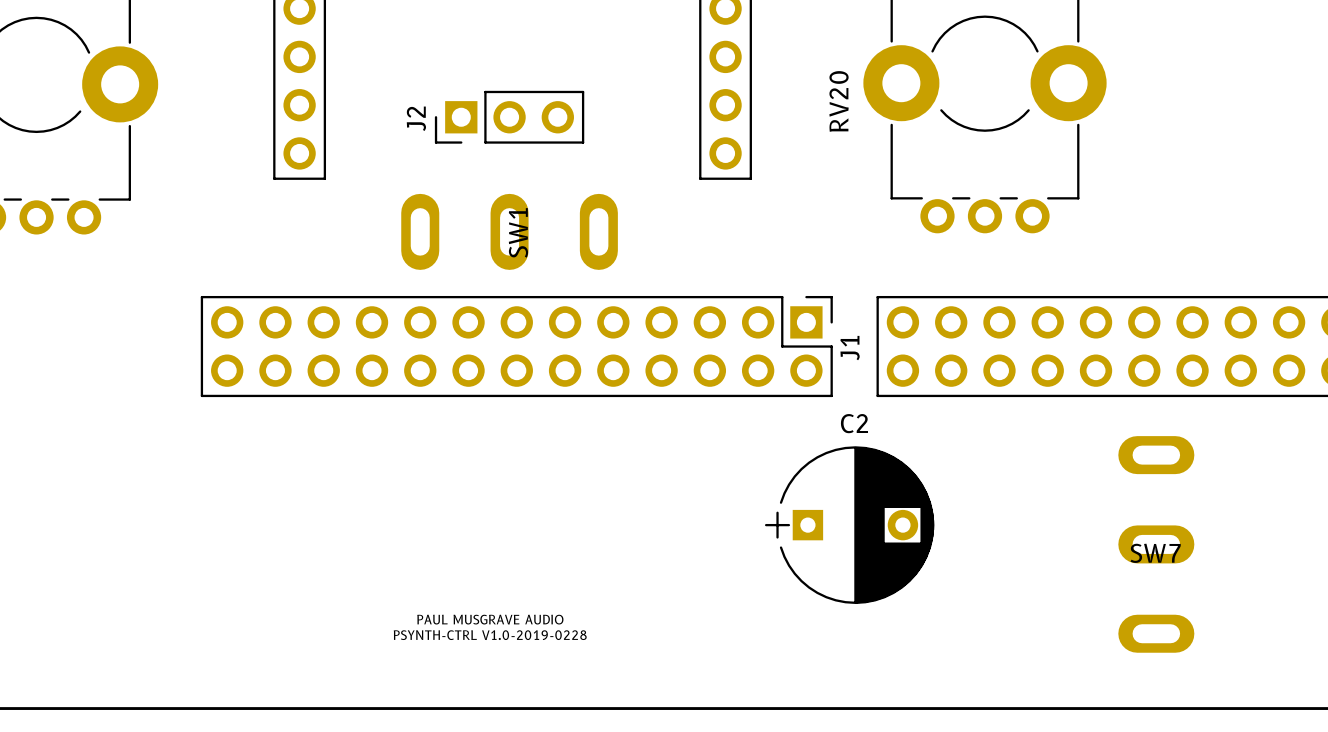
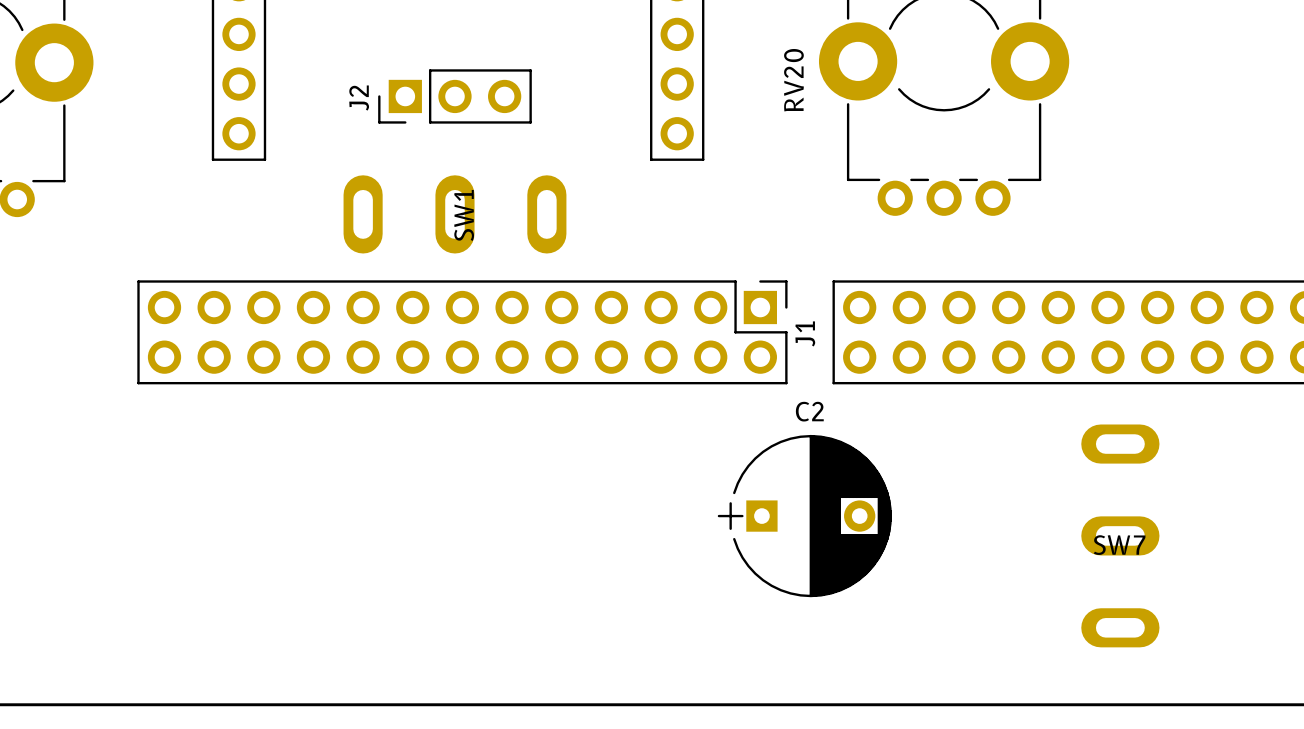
text: PAUL MUSGRAVE AUDIO (490, 619) -> none
text: PSYNTH-CTRL V1.0-2019-0228 (490, 635) -> none

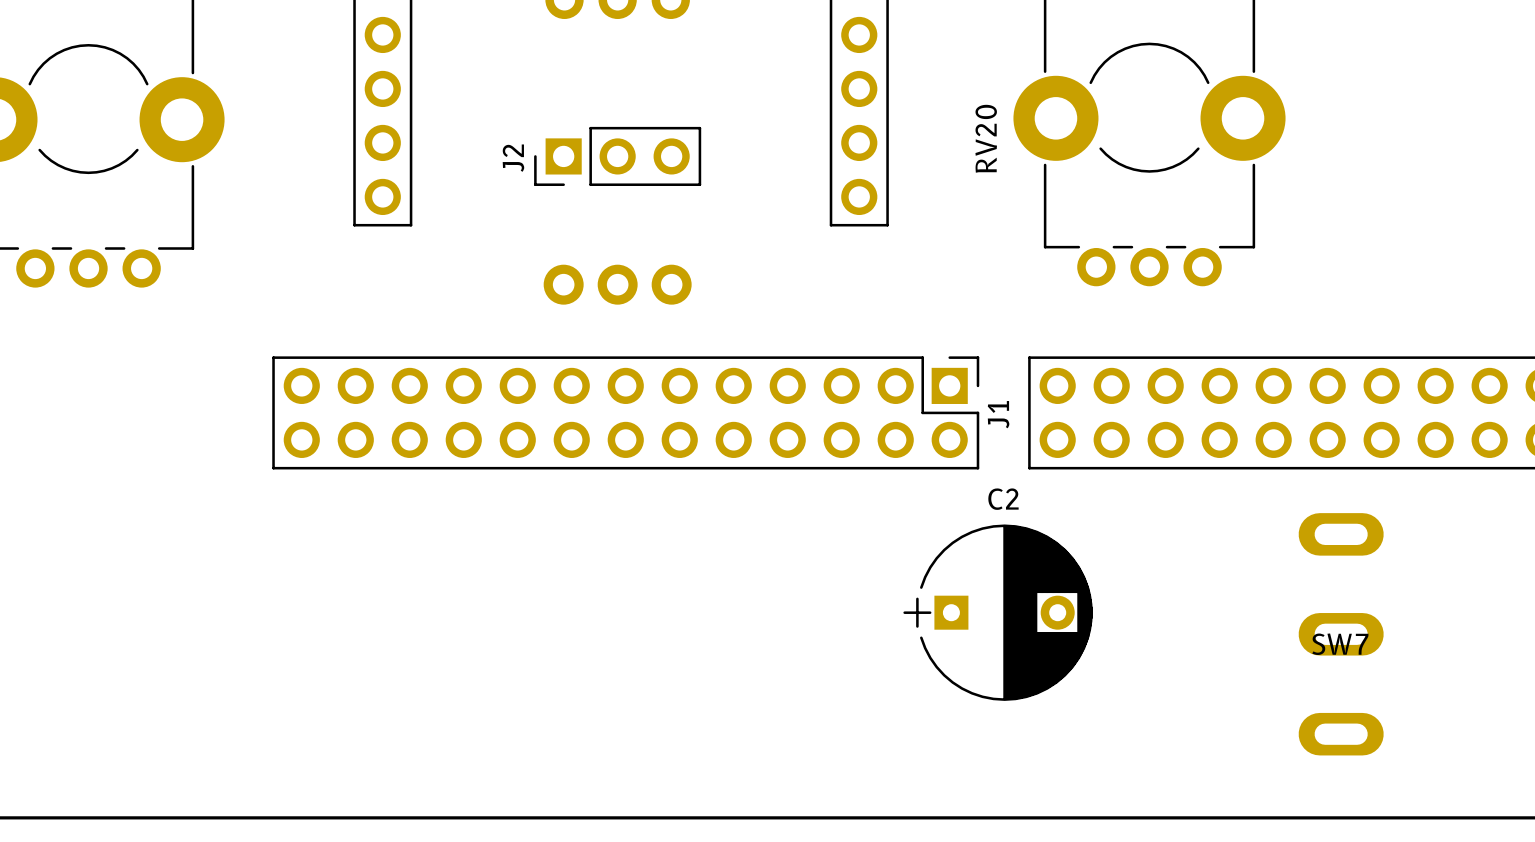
SW1: (454, 214) -> none
part: none -> (617, 284)

